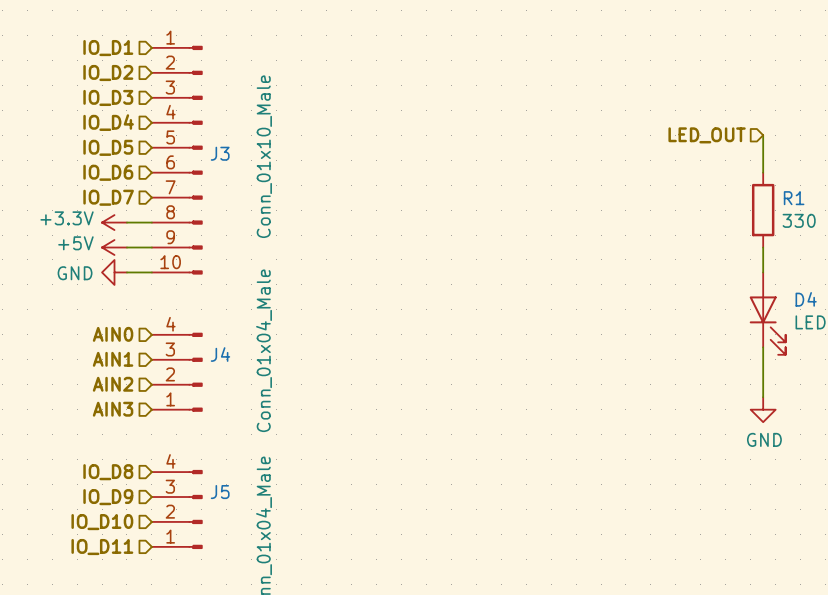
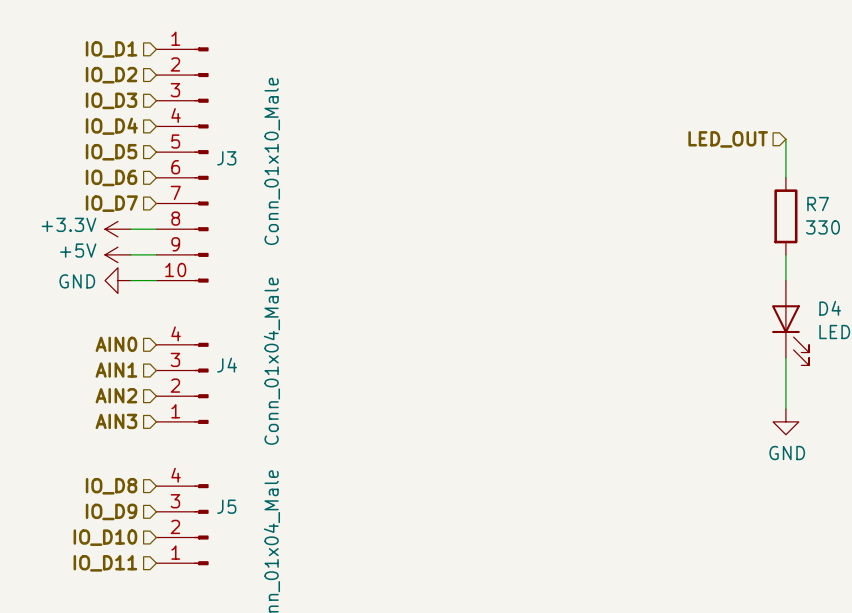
R1 name: R1 (794, 198) -> R7 (818, 204)

